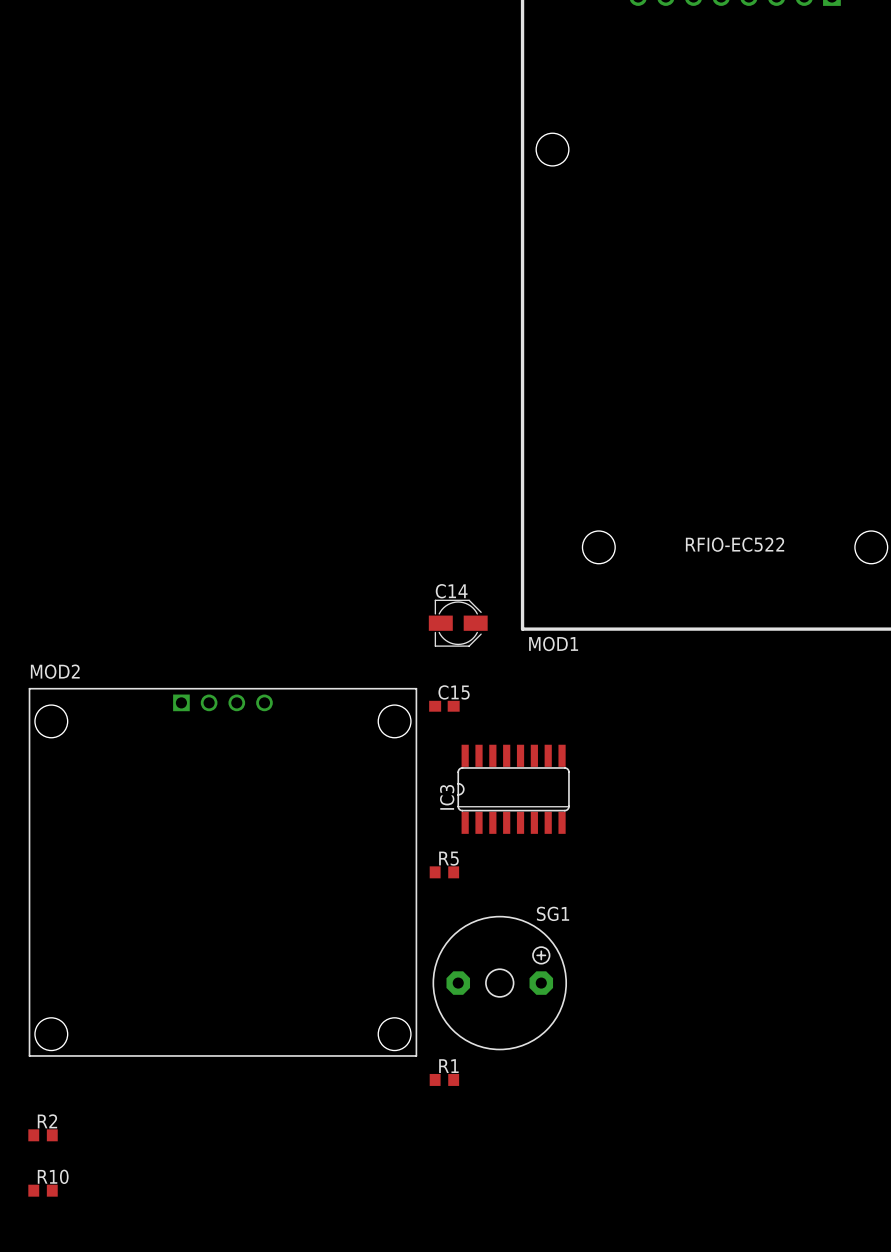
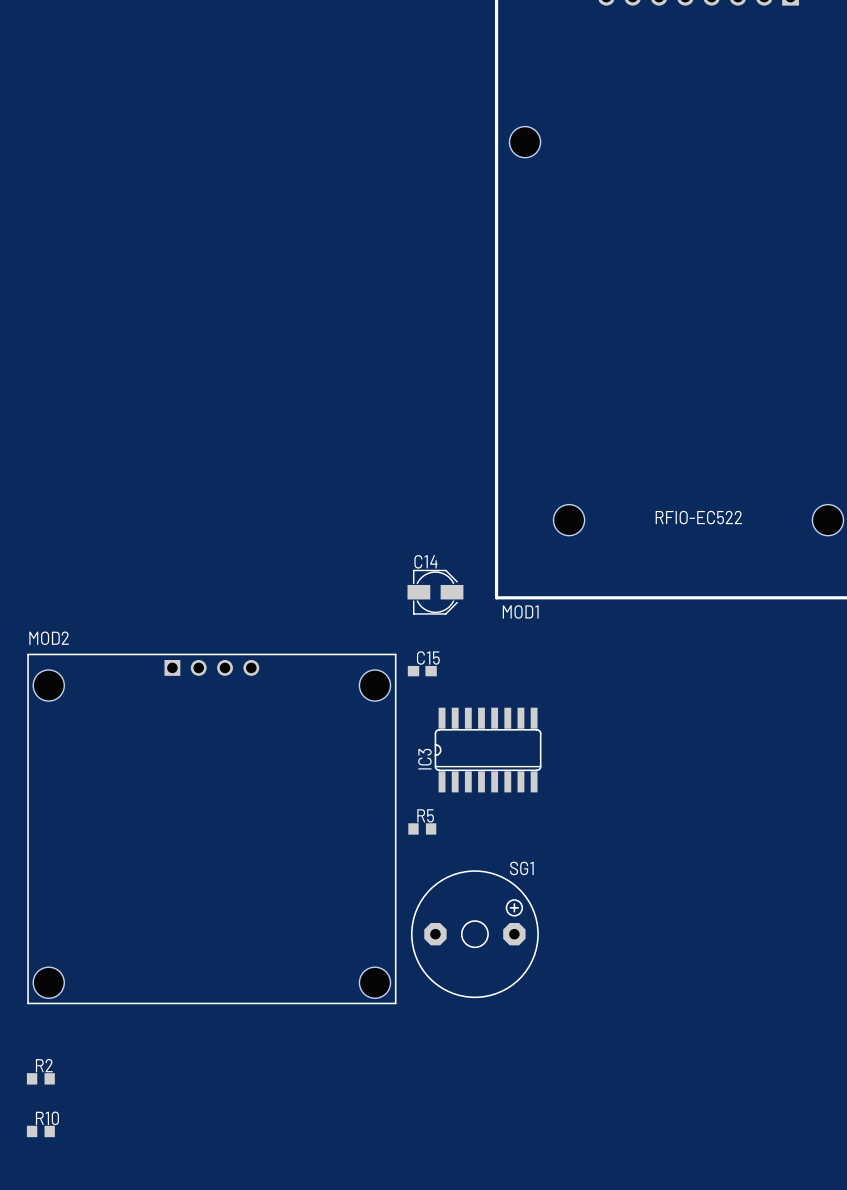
R1: (444, 1079) -> none

